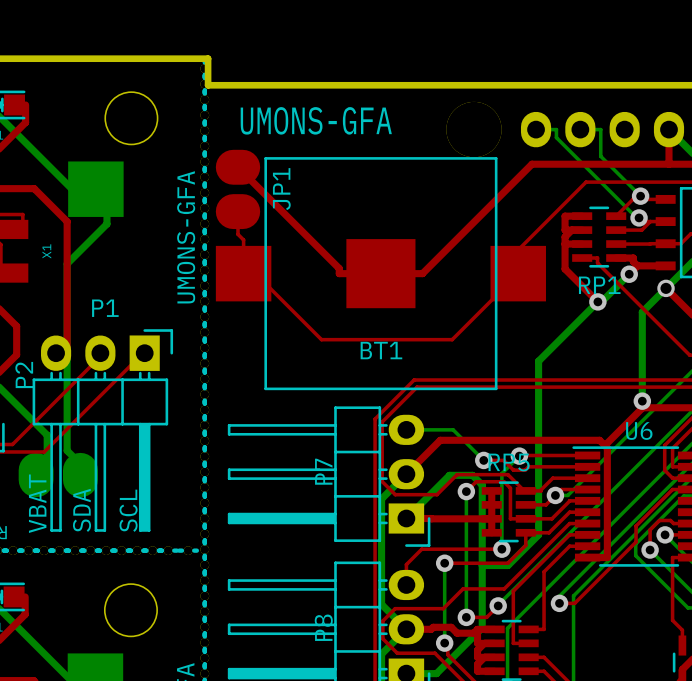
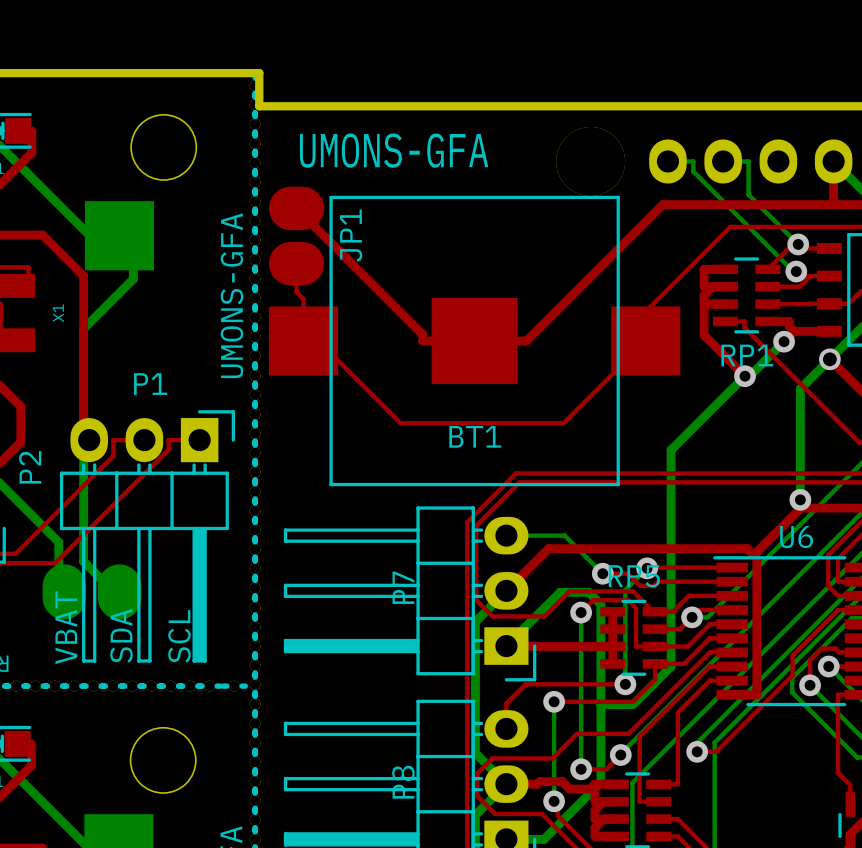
P1 position: (102, 430) -> (147, 536)
part position: (58, 475) -> (91, 591)
text position: VBAT (37, 503) -> VBAT (66, 627)
text position: SDA (82, 510) -> SDA (121, 635)
text position: SCL (128, 510) -> SCL (179, 636)

